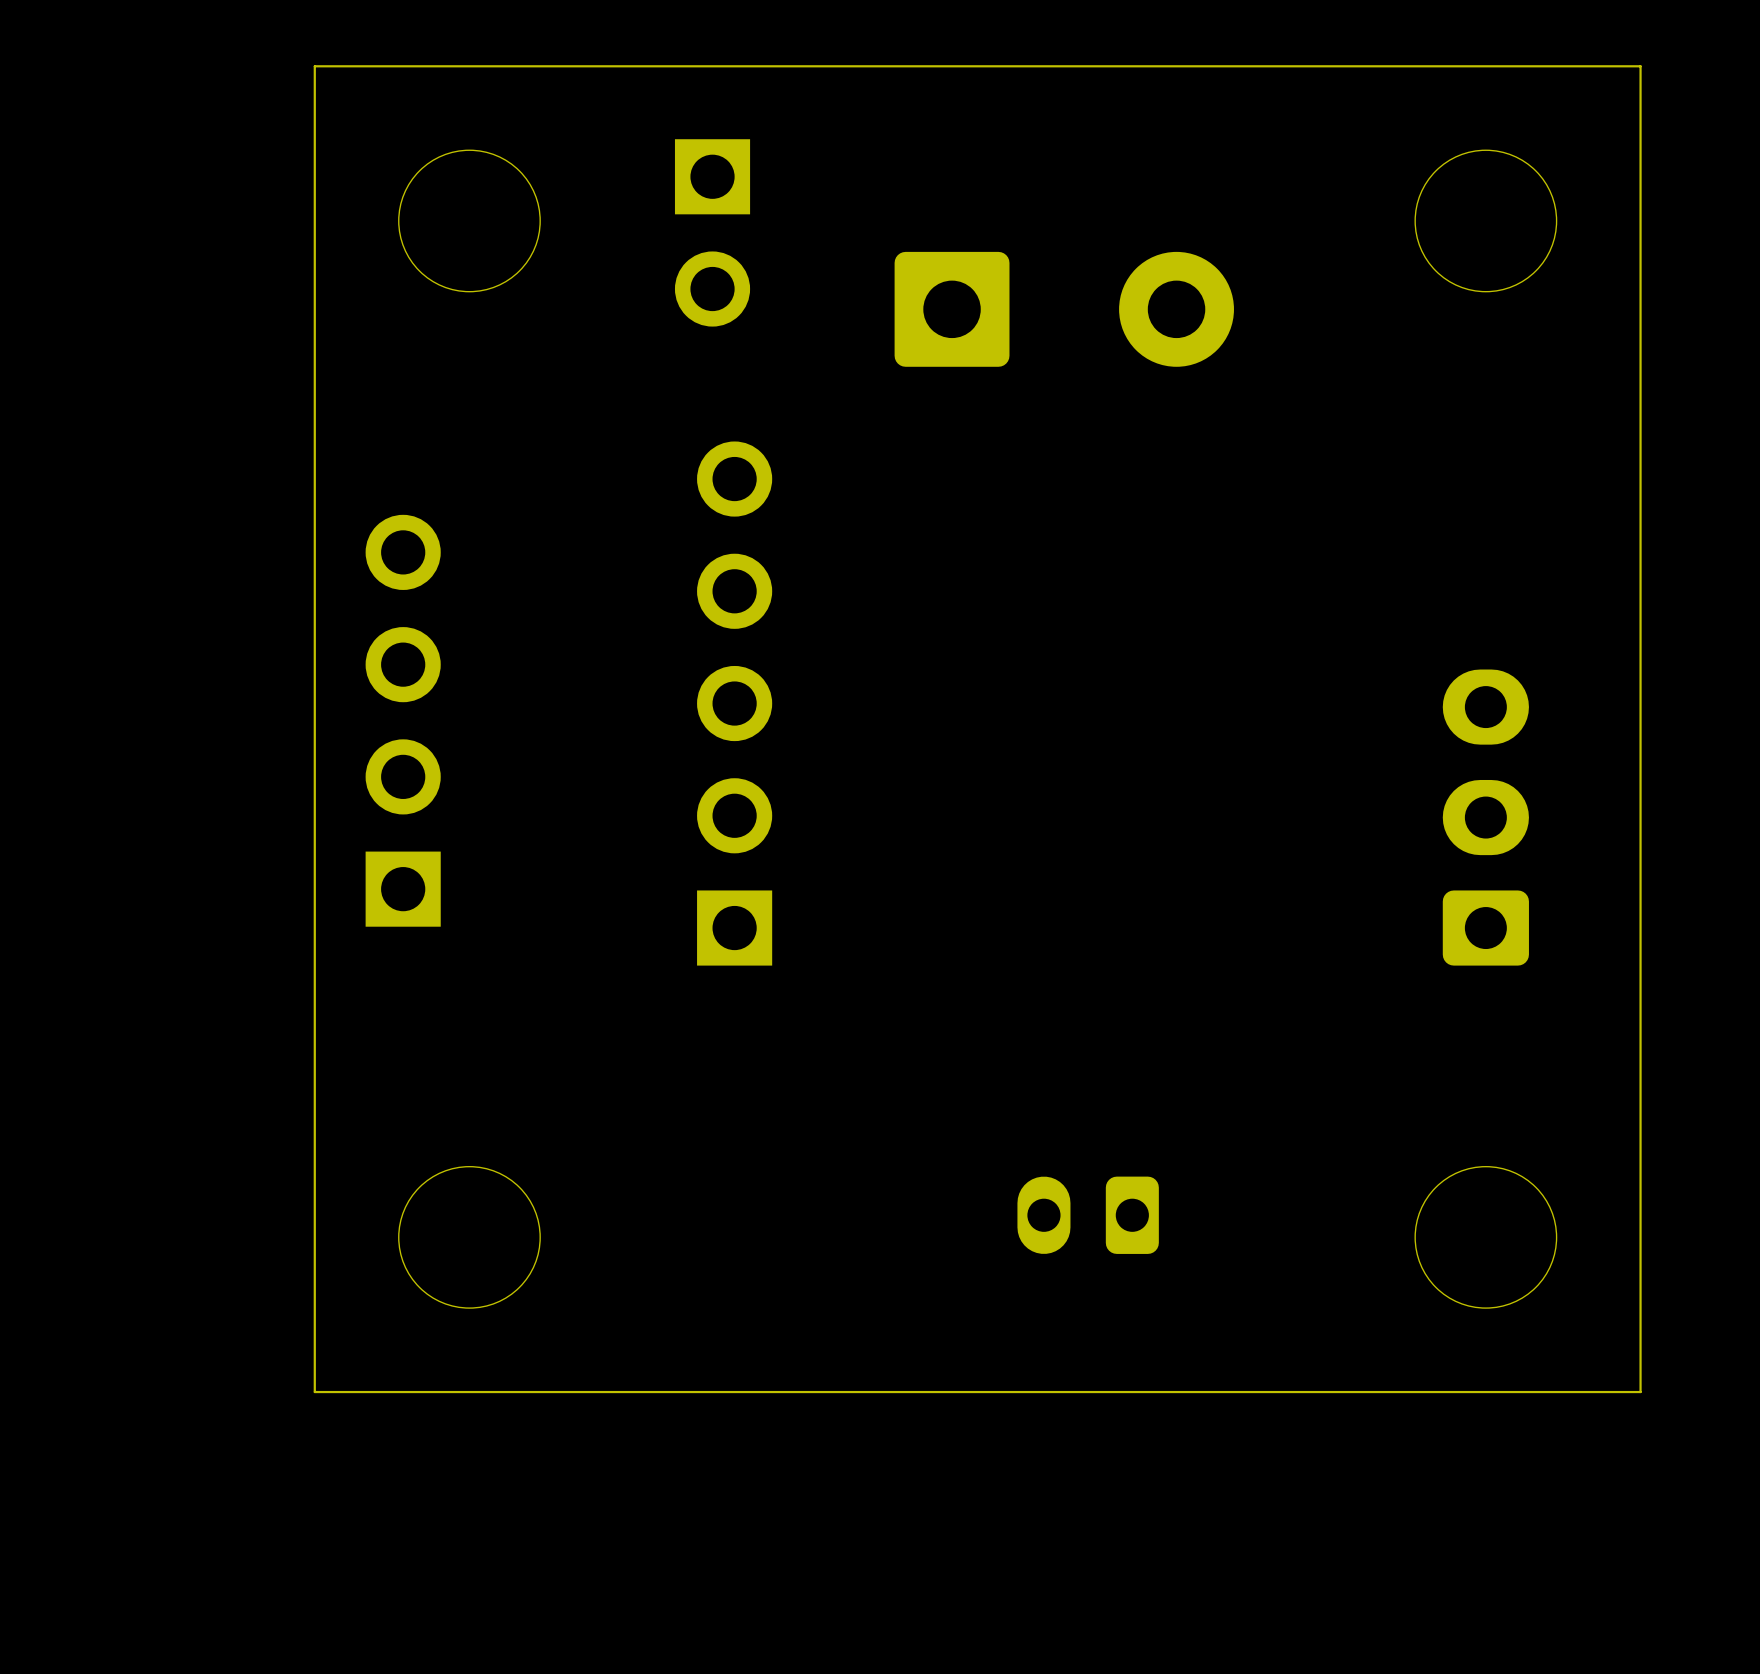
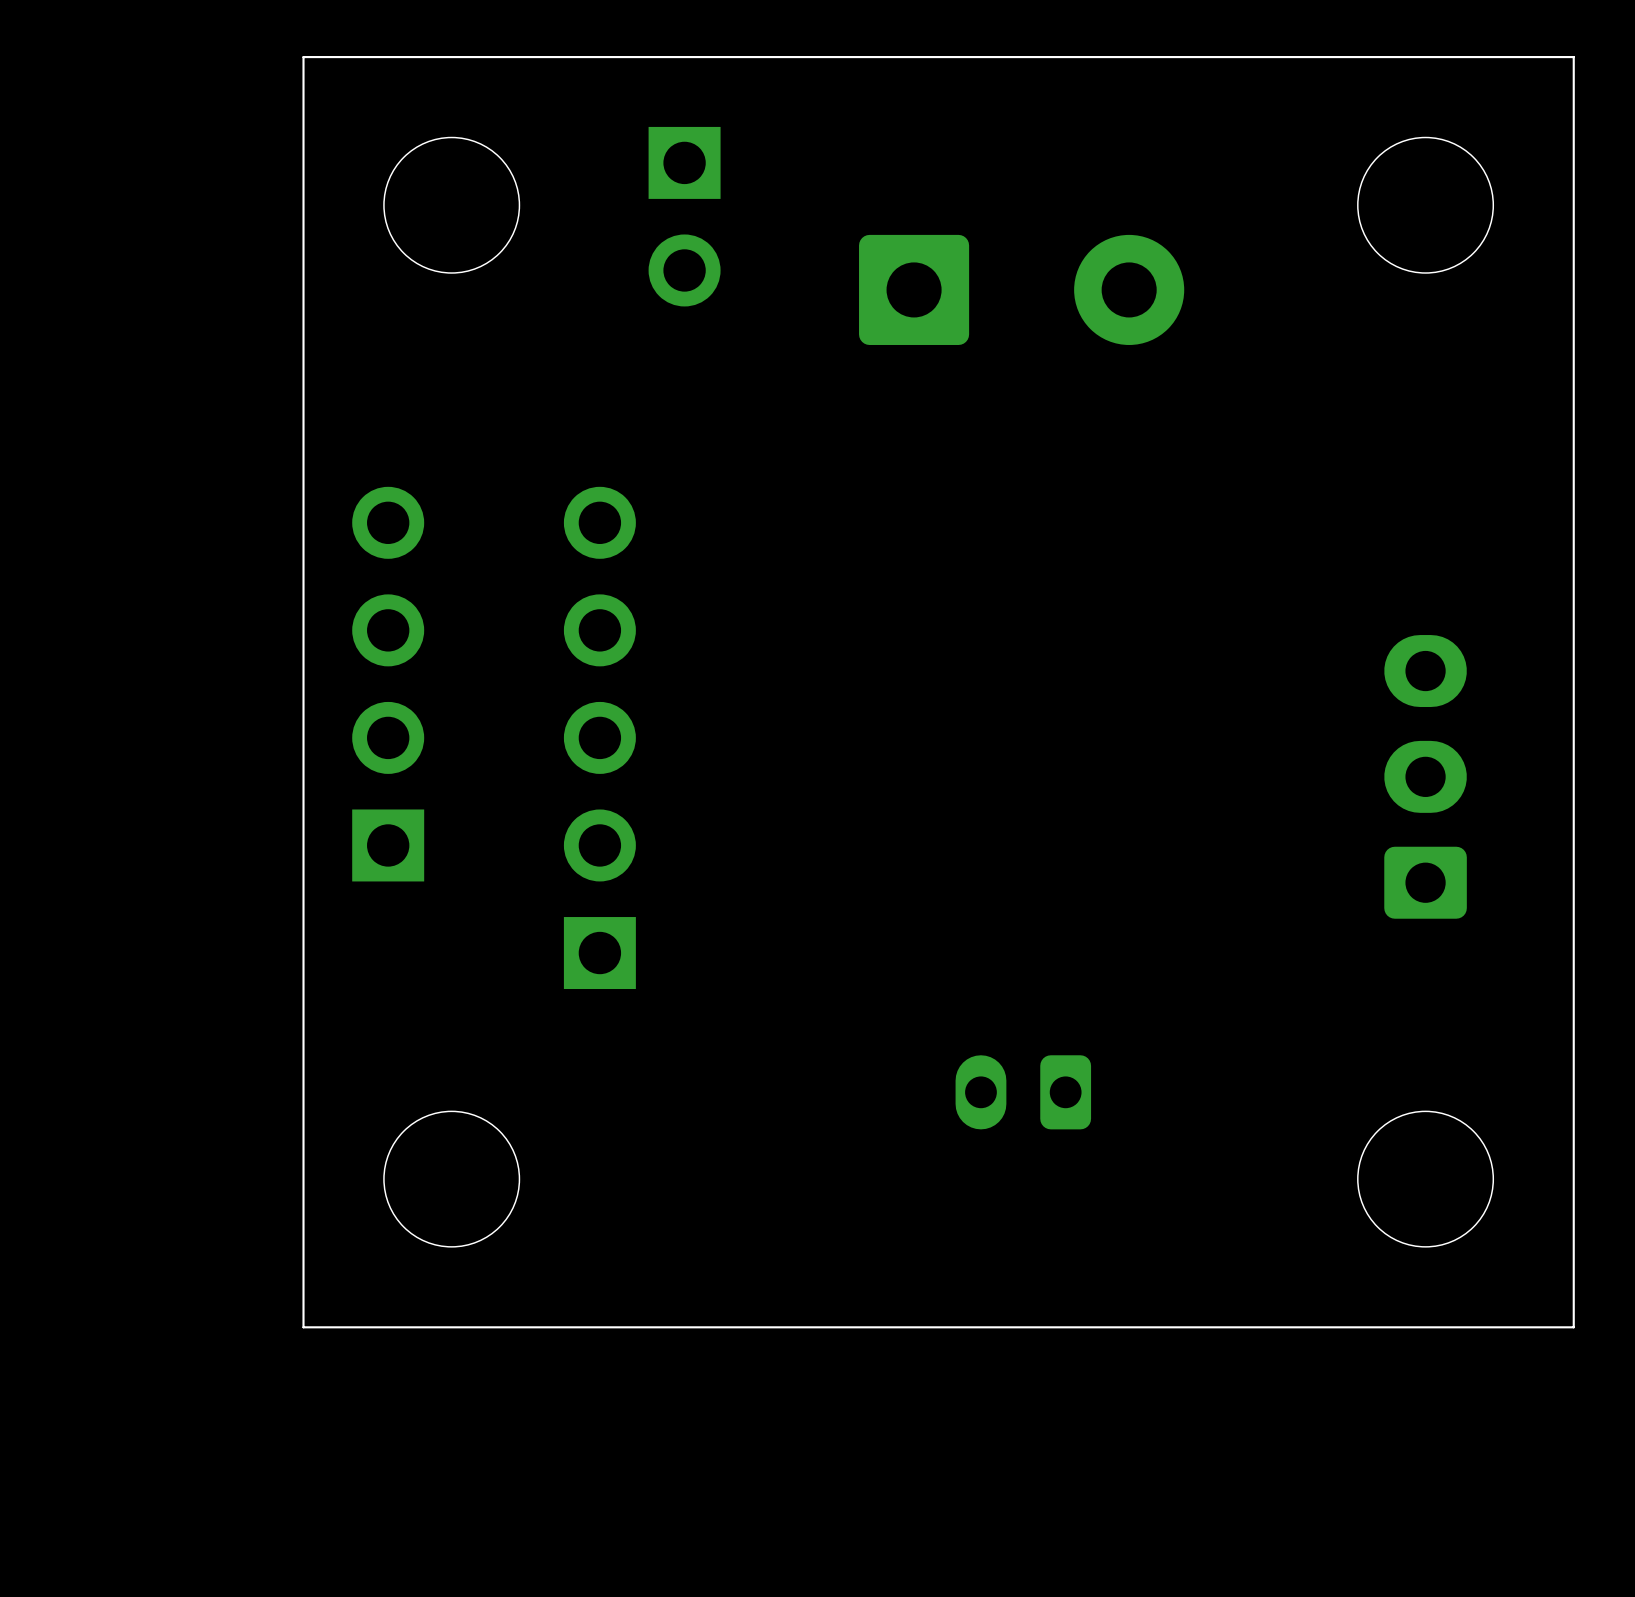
part position: (734, 703) -> (599, 737)
part position: (1088, 1215) -> (1023, 1092)

